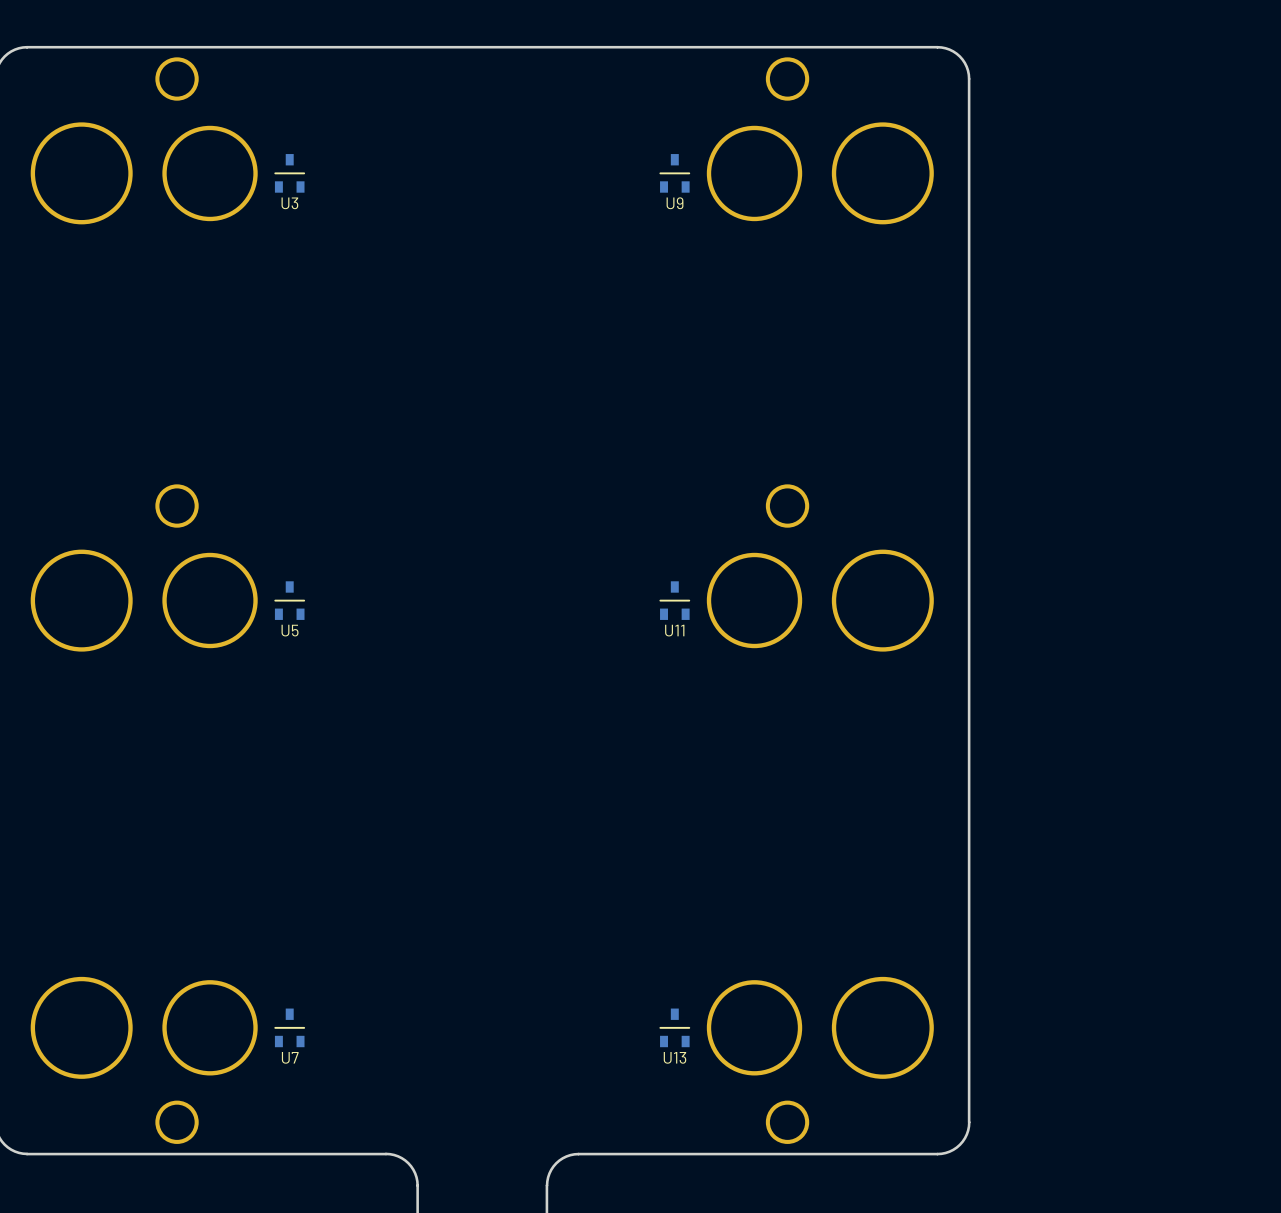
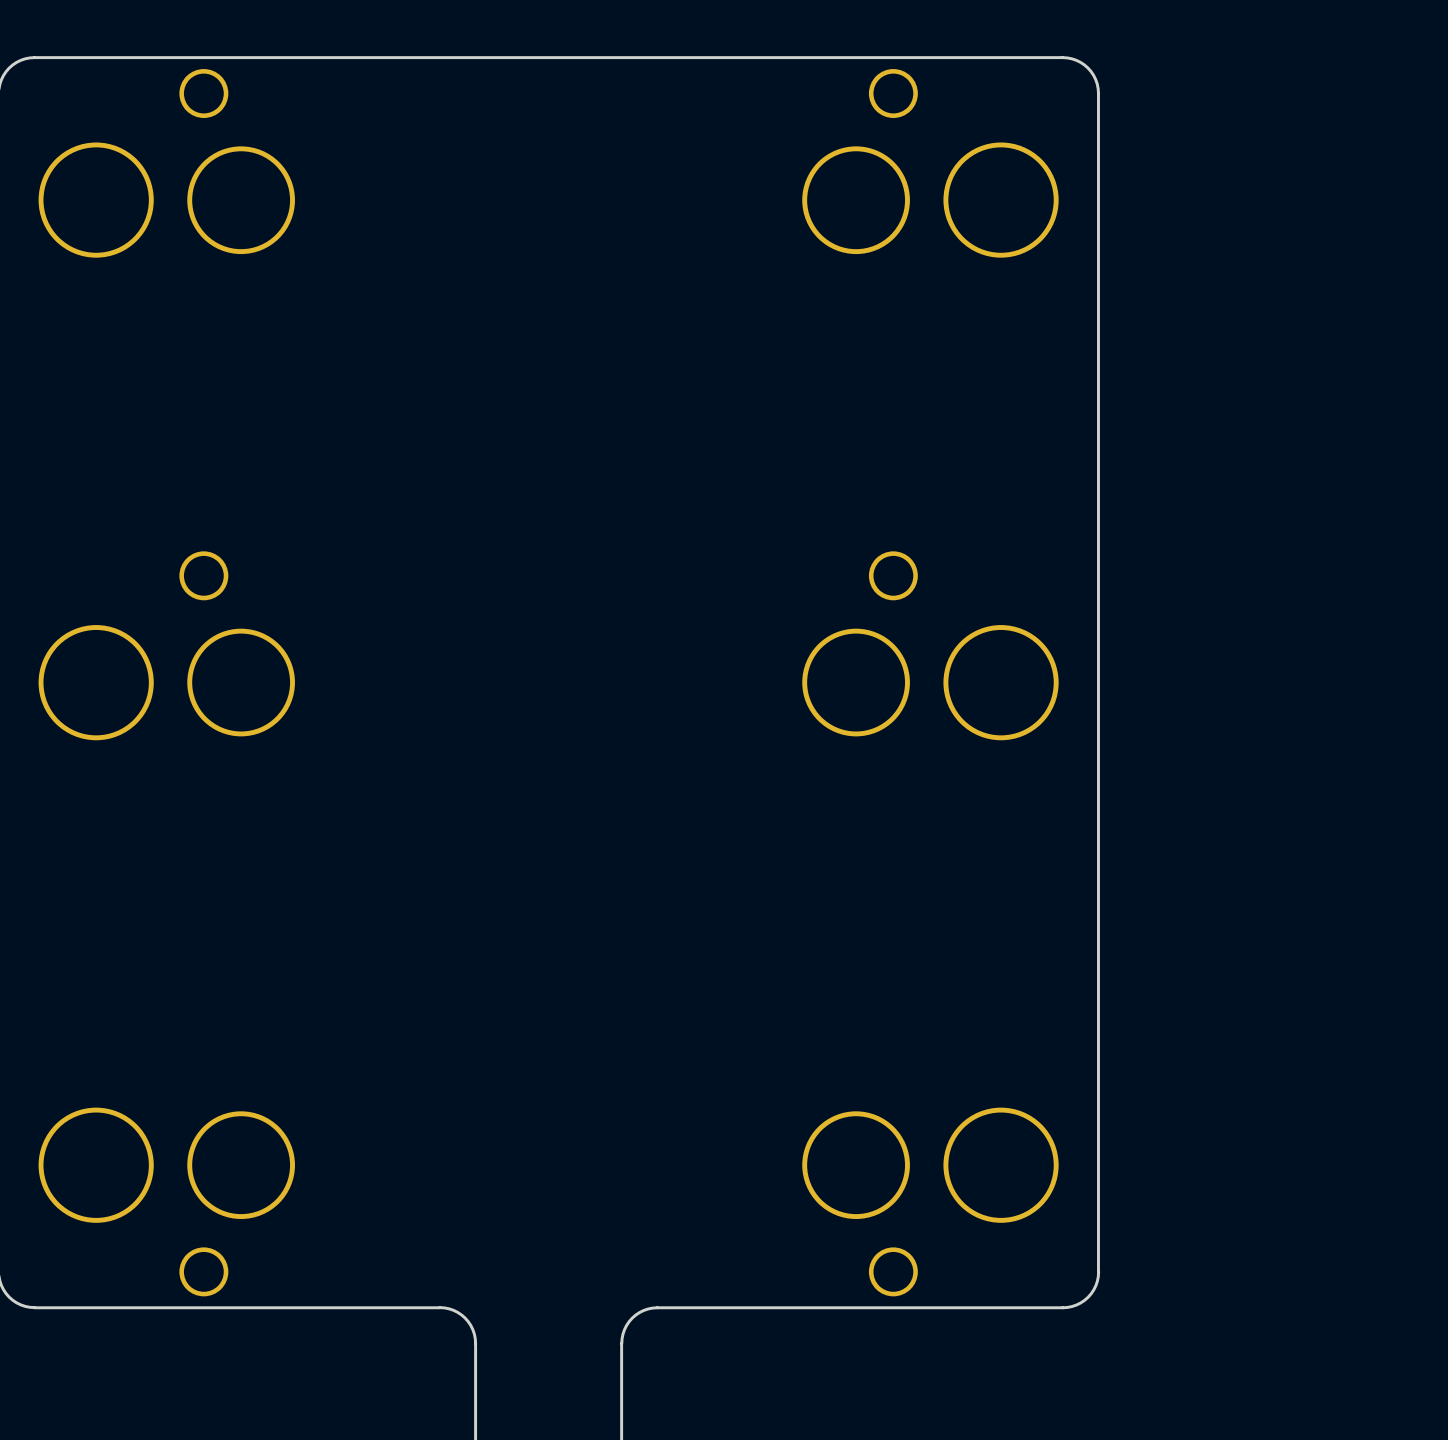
U3: (289, 173) -> none
U9: (674, 173) -> none
U5: (289, 600) -> none
U11: (674, 600) -> none
U7: (289, 1027) -> none
U13: (674, 1027) -> none

